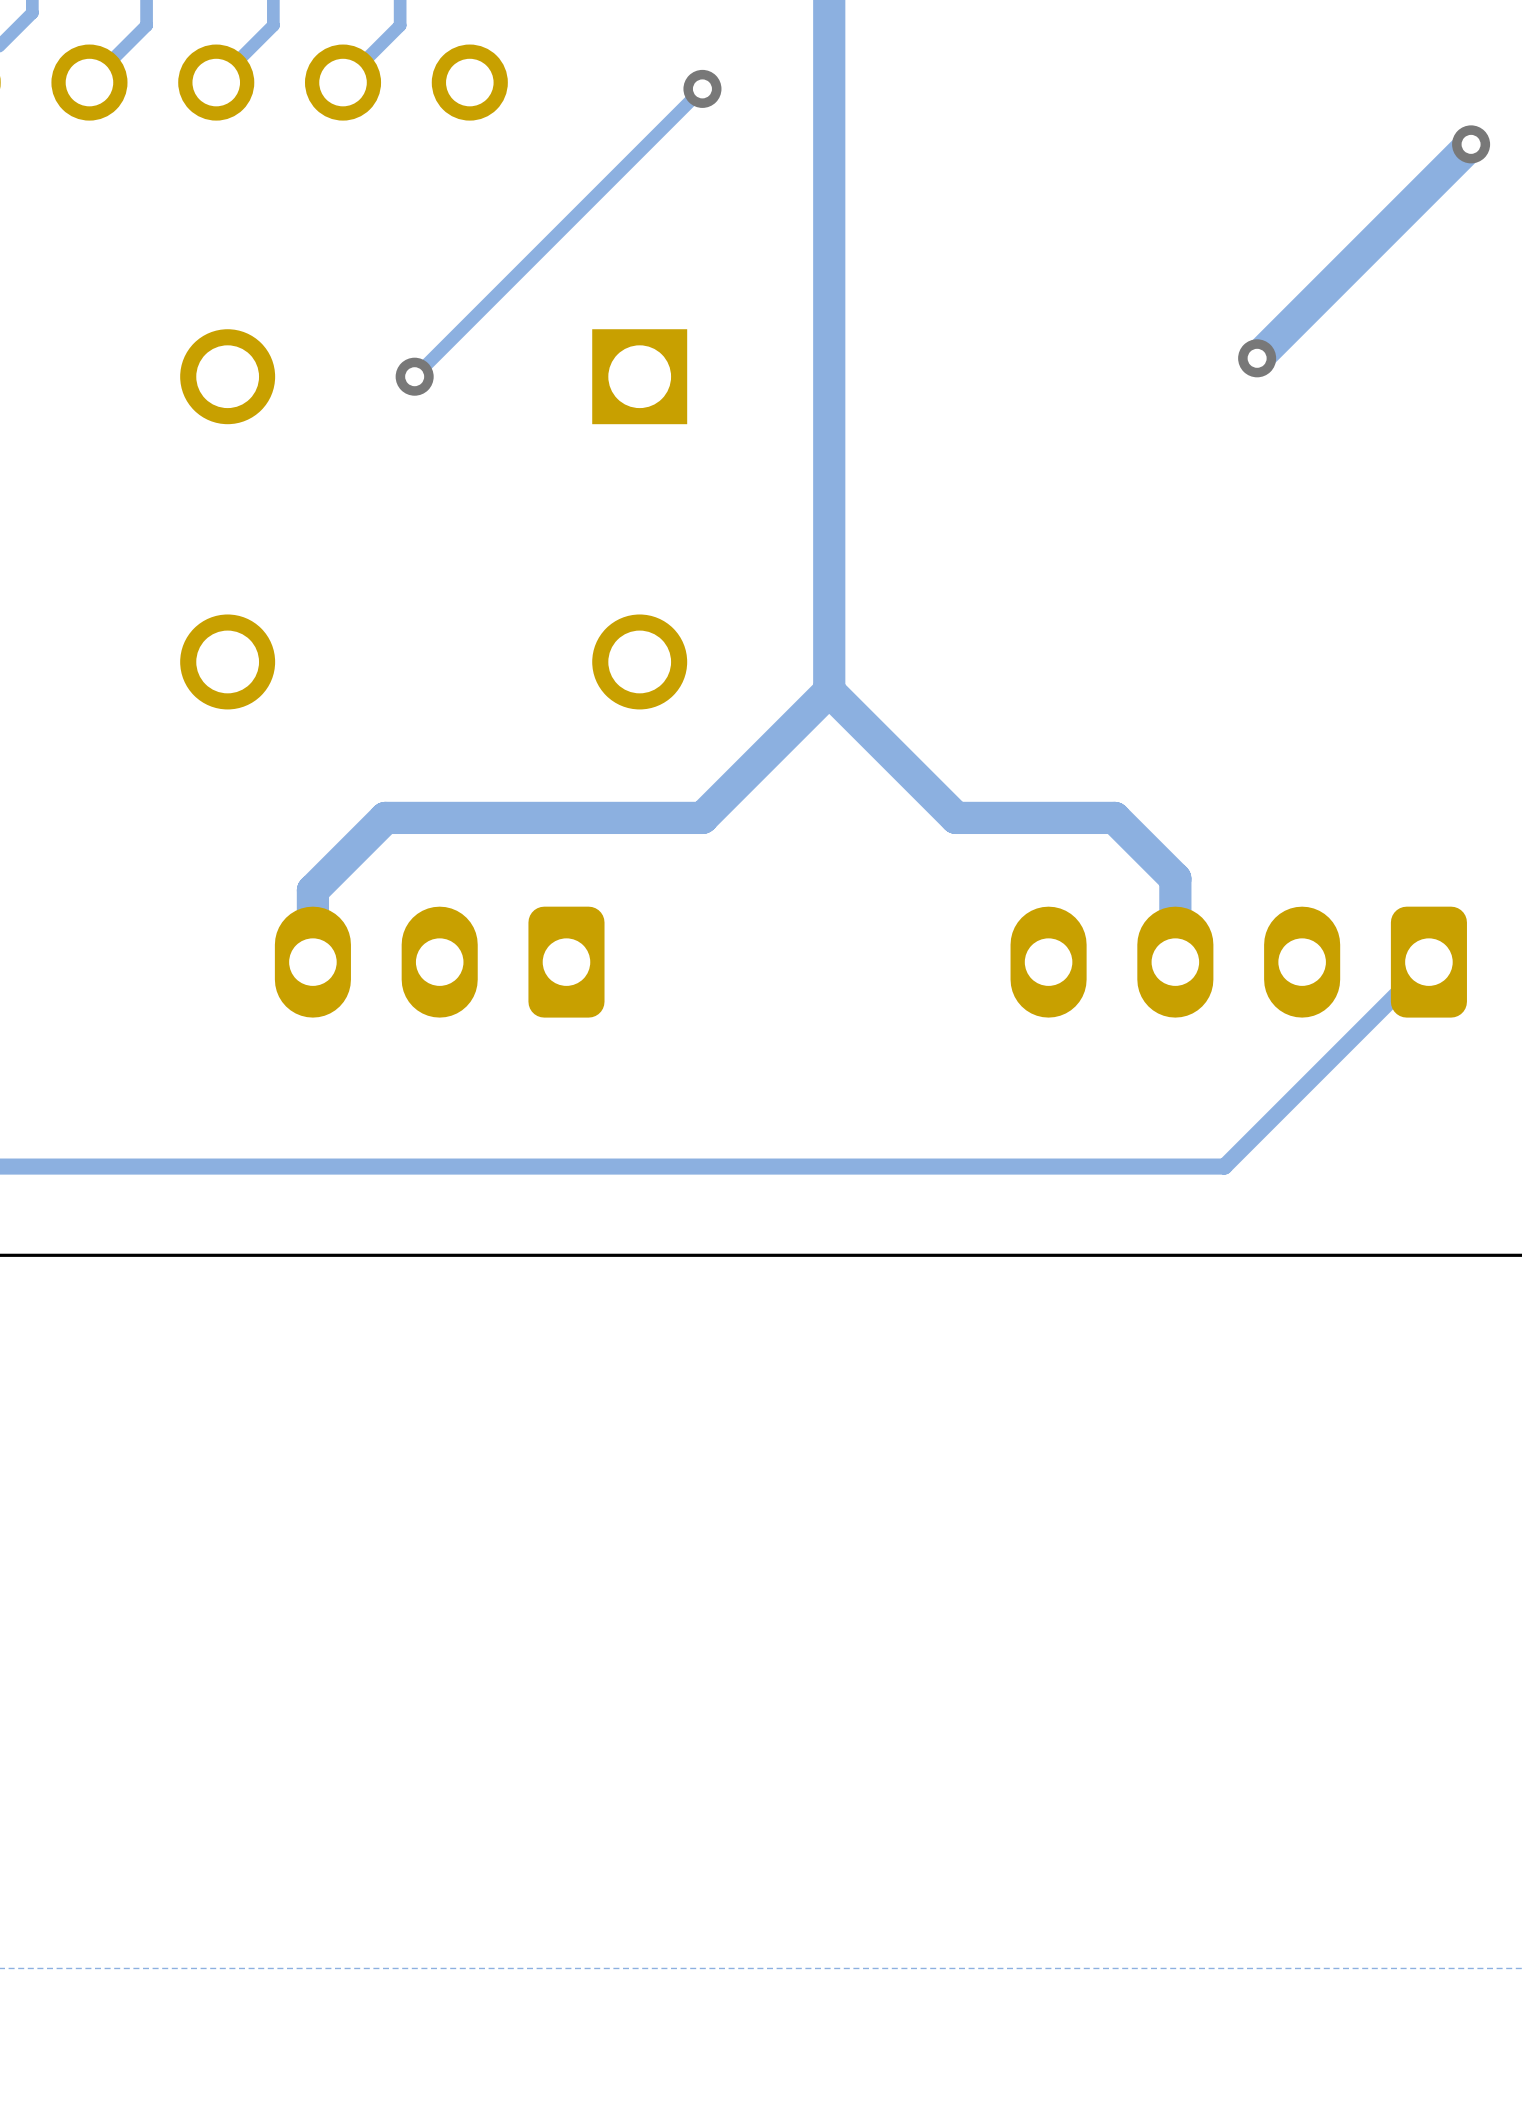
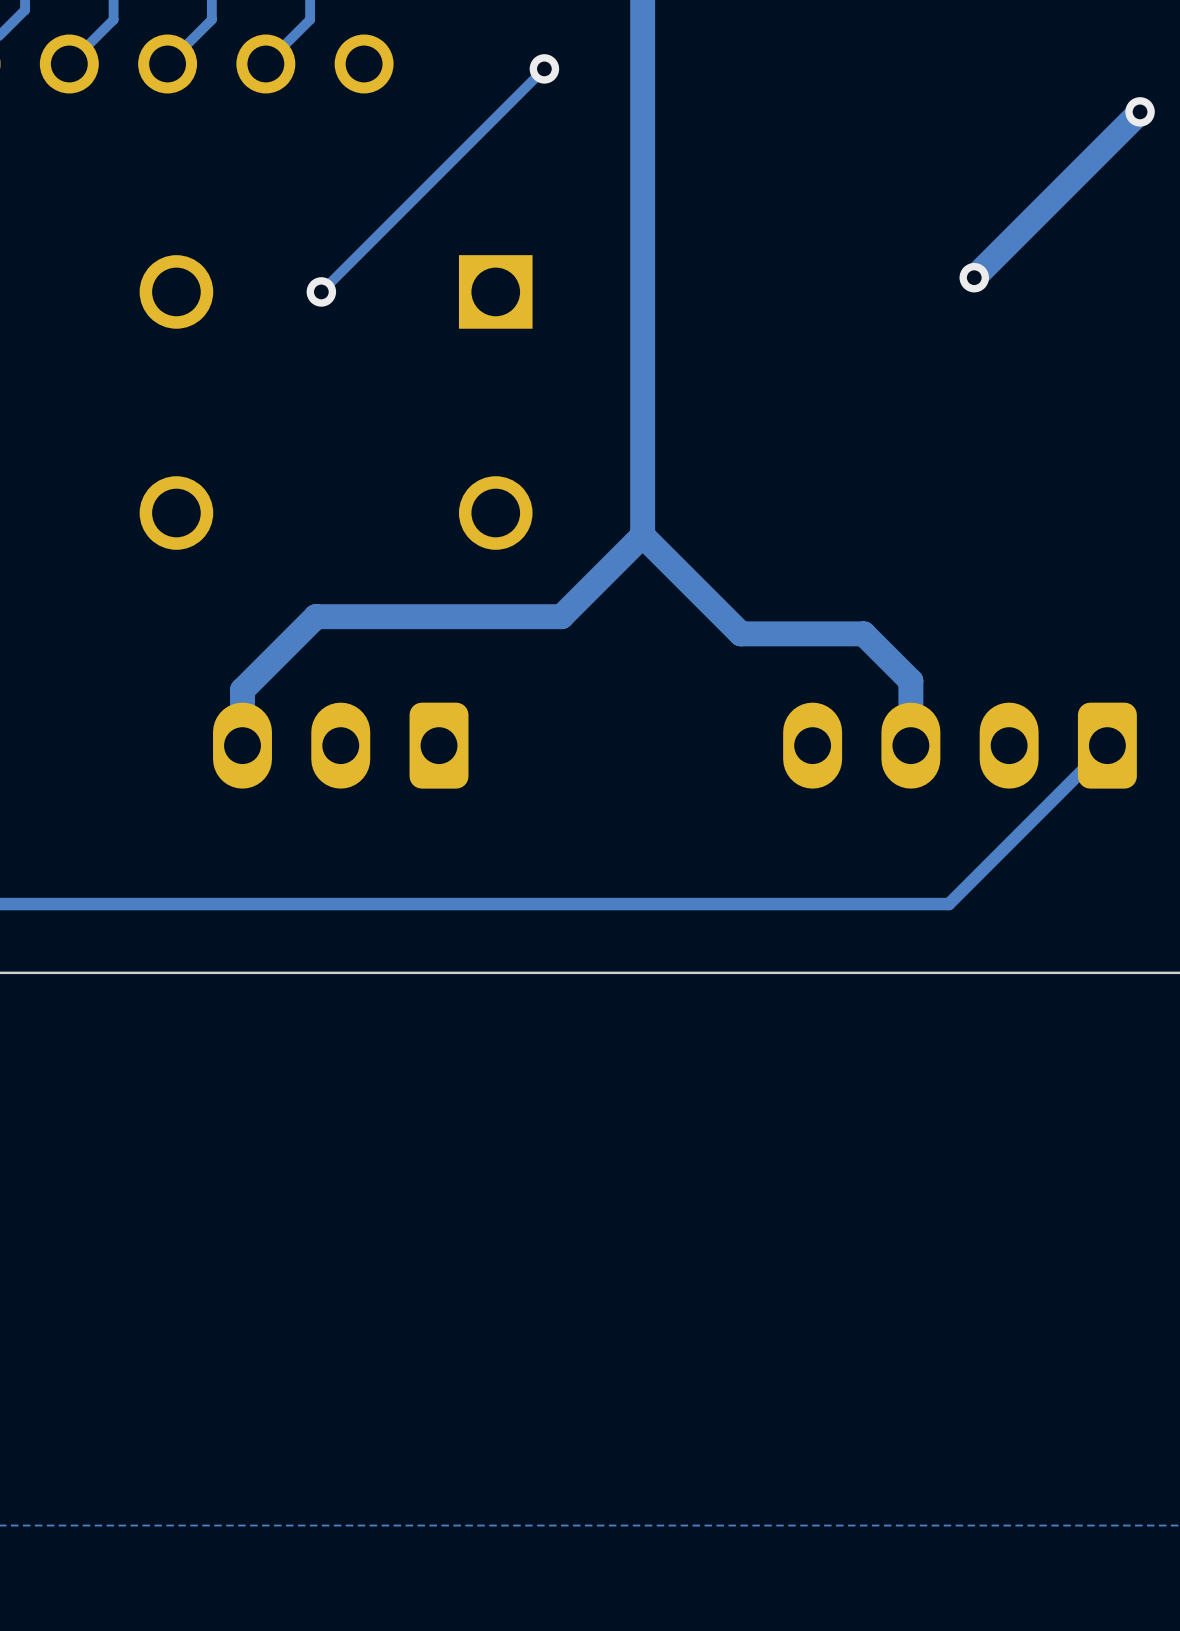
track: (724, 795) (702, 817) (385, 817) -> (561, 616) (315, 616) (298, 633)

